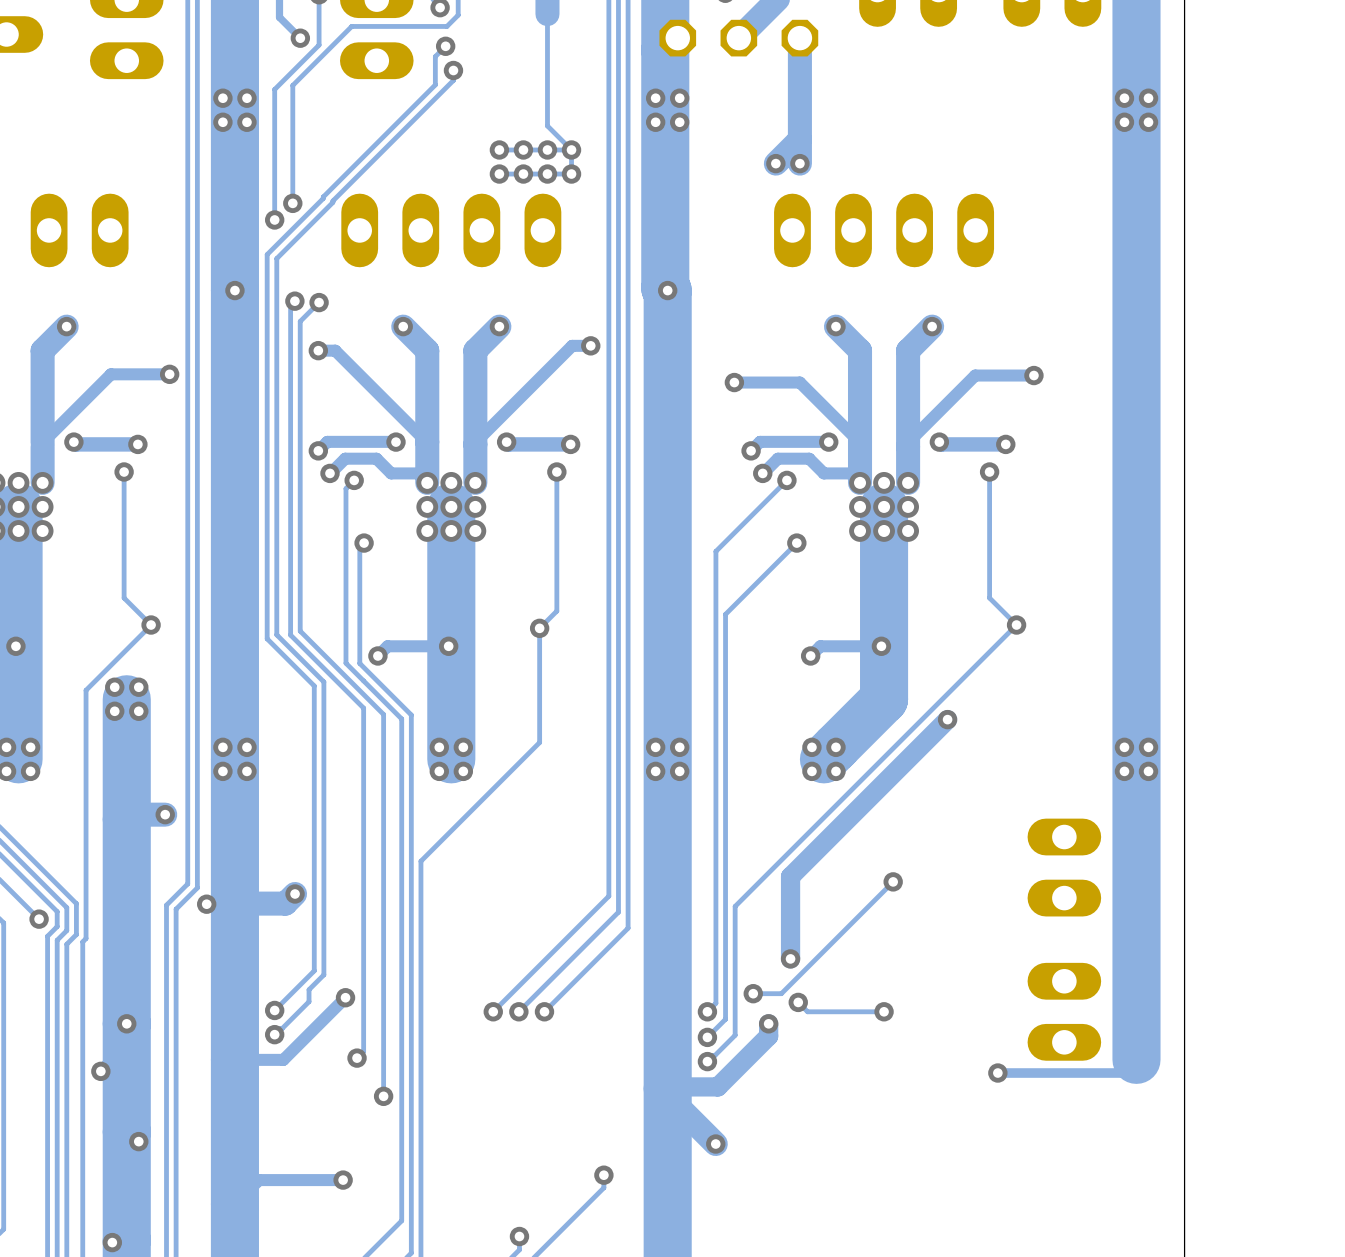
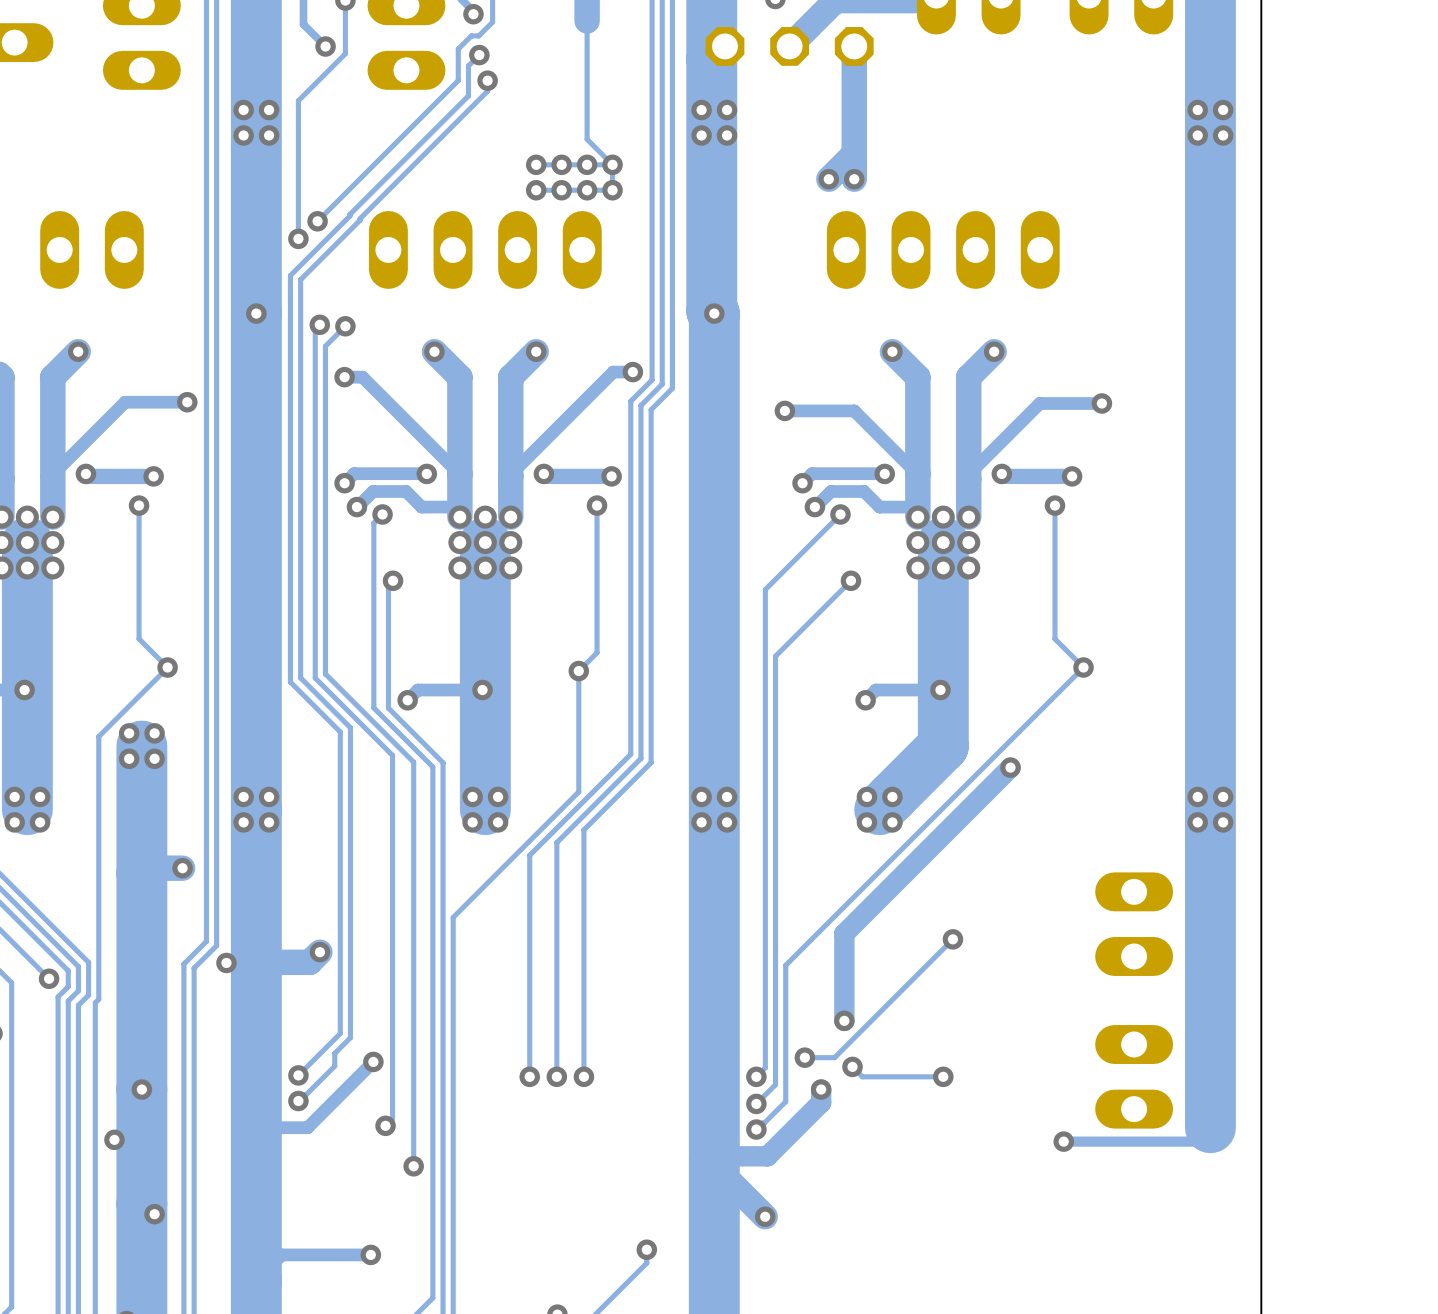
track: (446, 26) (351, 26) (292, 85) (292, 203) -> (480, 34) (471, 35) (458, 49) (458, 80) (317, 221)
track: (608, 353) (608, 896) (493, 1011) -> (652, 380) (630, 401) (630, 754) (529, 855) (529, 1076)
track: (618, 357) (618, 912) (518, 1011) -> (662, 384) (640, 405) (640, 758) (556, 842) (556, 1076)
track: (628, 361) (628, 928) (544, 1011) -> (672, 388) (651, 409) (651, 762) (583, 829) (583, 1076)

